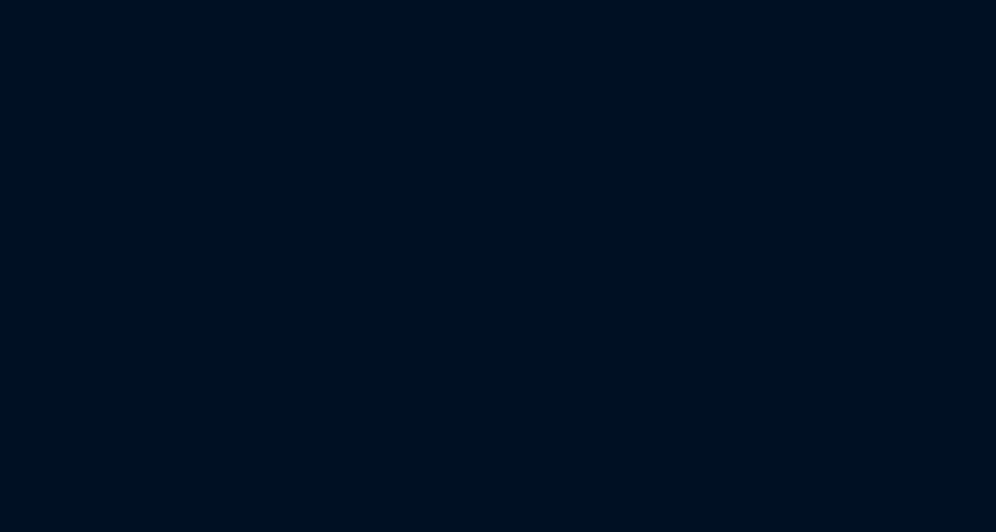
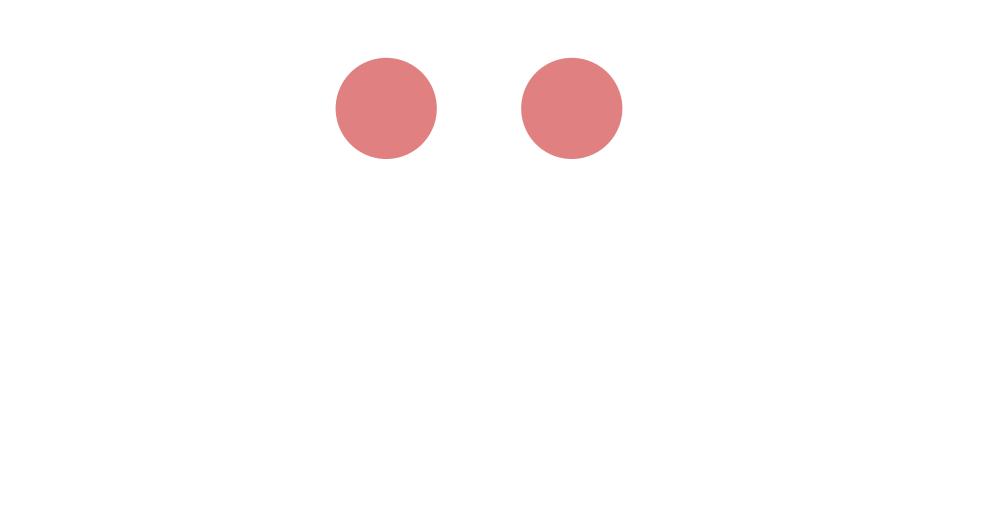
part: none -> (386, 108)
part: none -> (571, 108)

